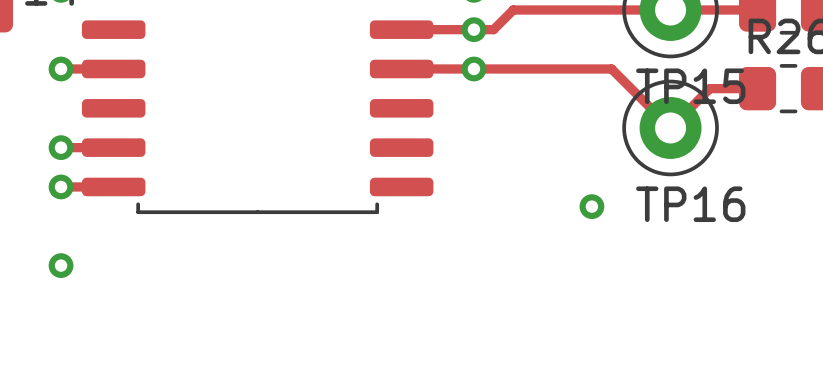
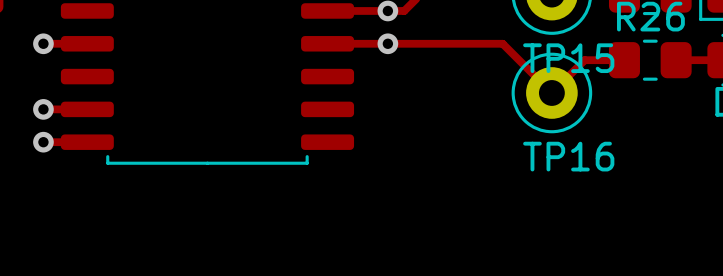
via: (591, 206) -> none
via: (61, 265) -> none

